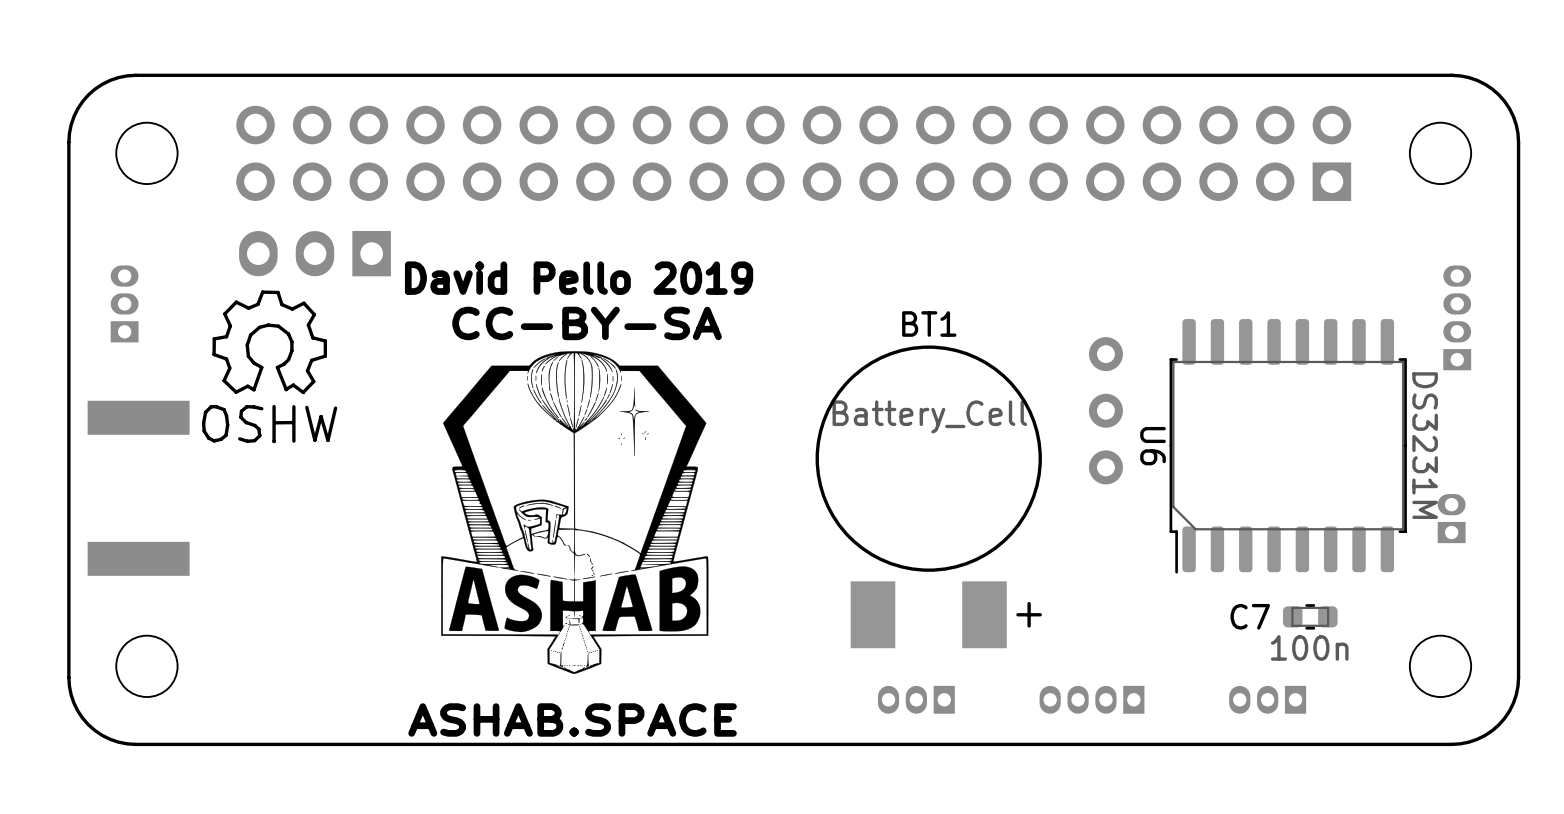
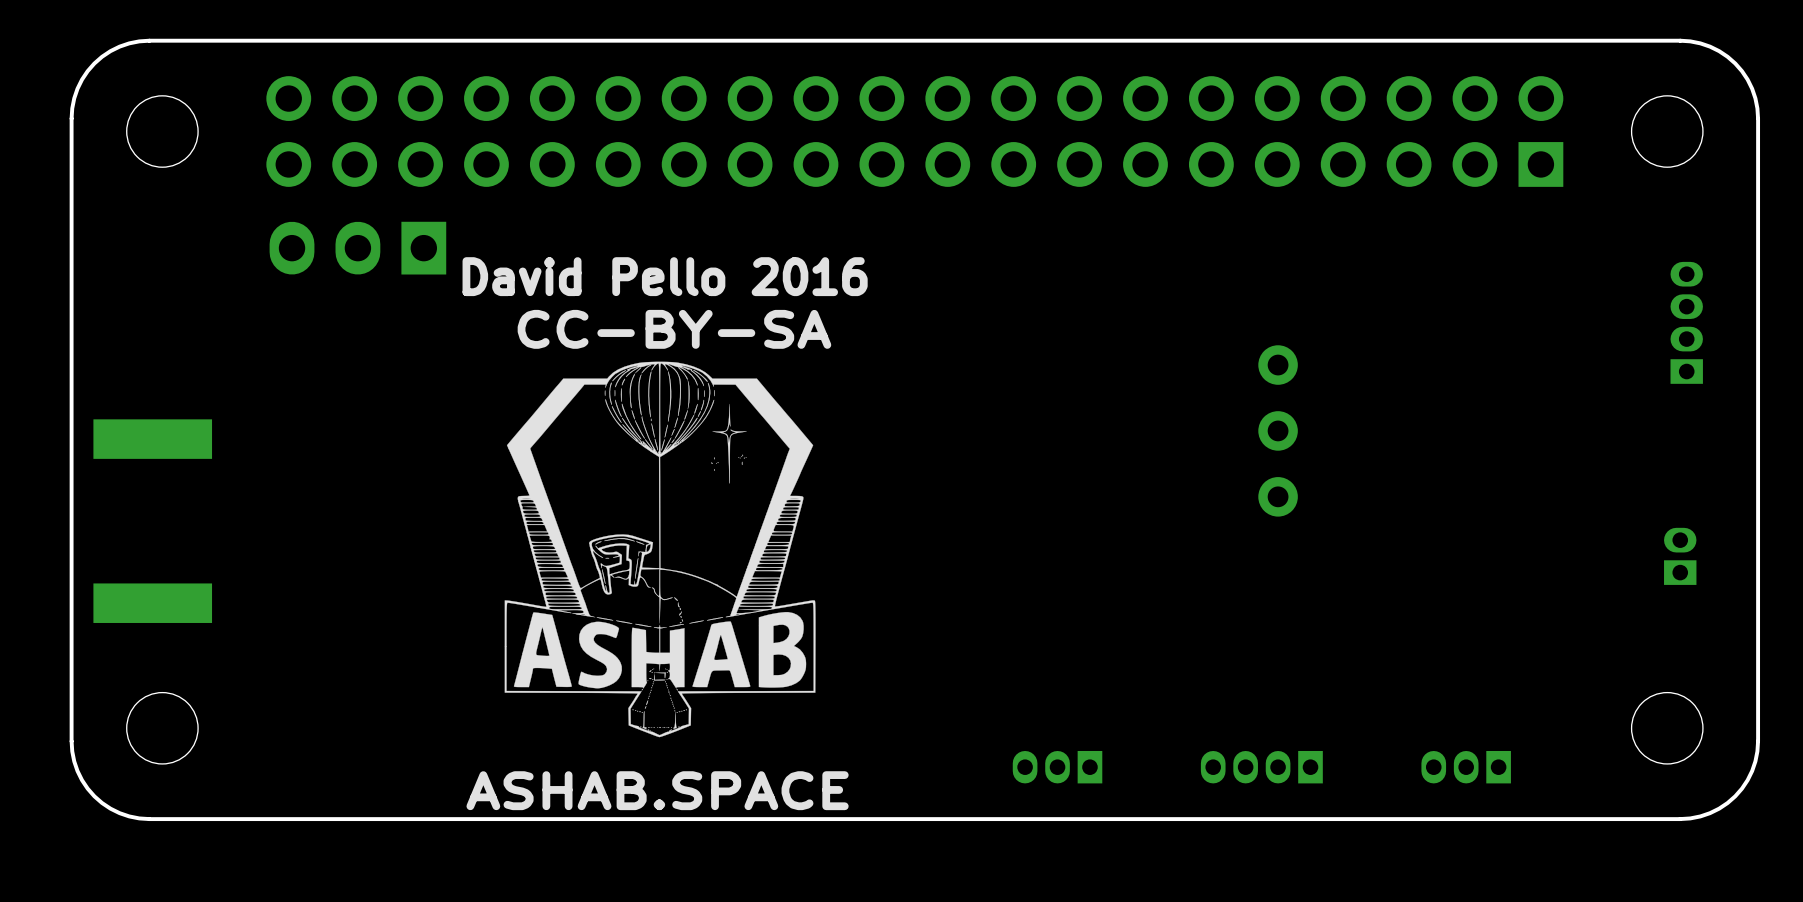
text: David Pello 2019 (579, 278) -> David Pello 2016 (665, 276)
drawing: [201, 290, 338, 444] -> none
part: (124, 303) -> none
U6: DS3231M (1288, 446) -> none
BT1: Battery_Cell (928, 496) -> none
C7: 100n (1310, 616) -> none

